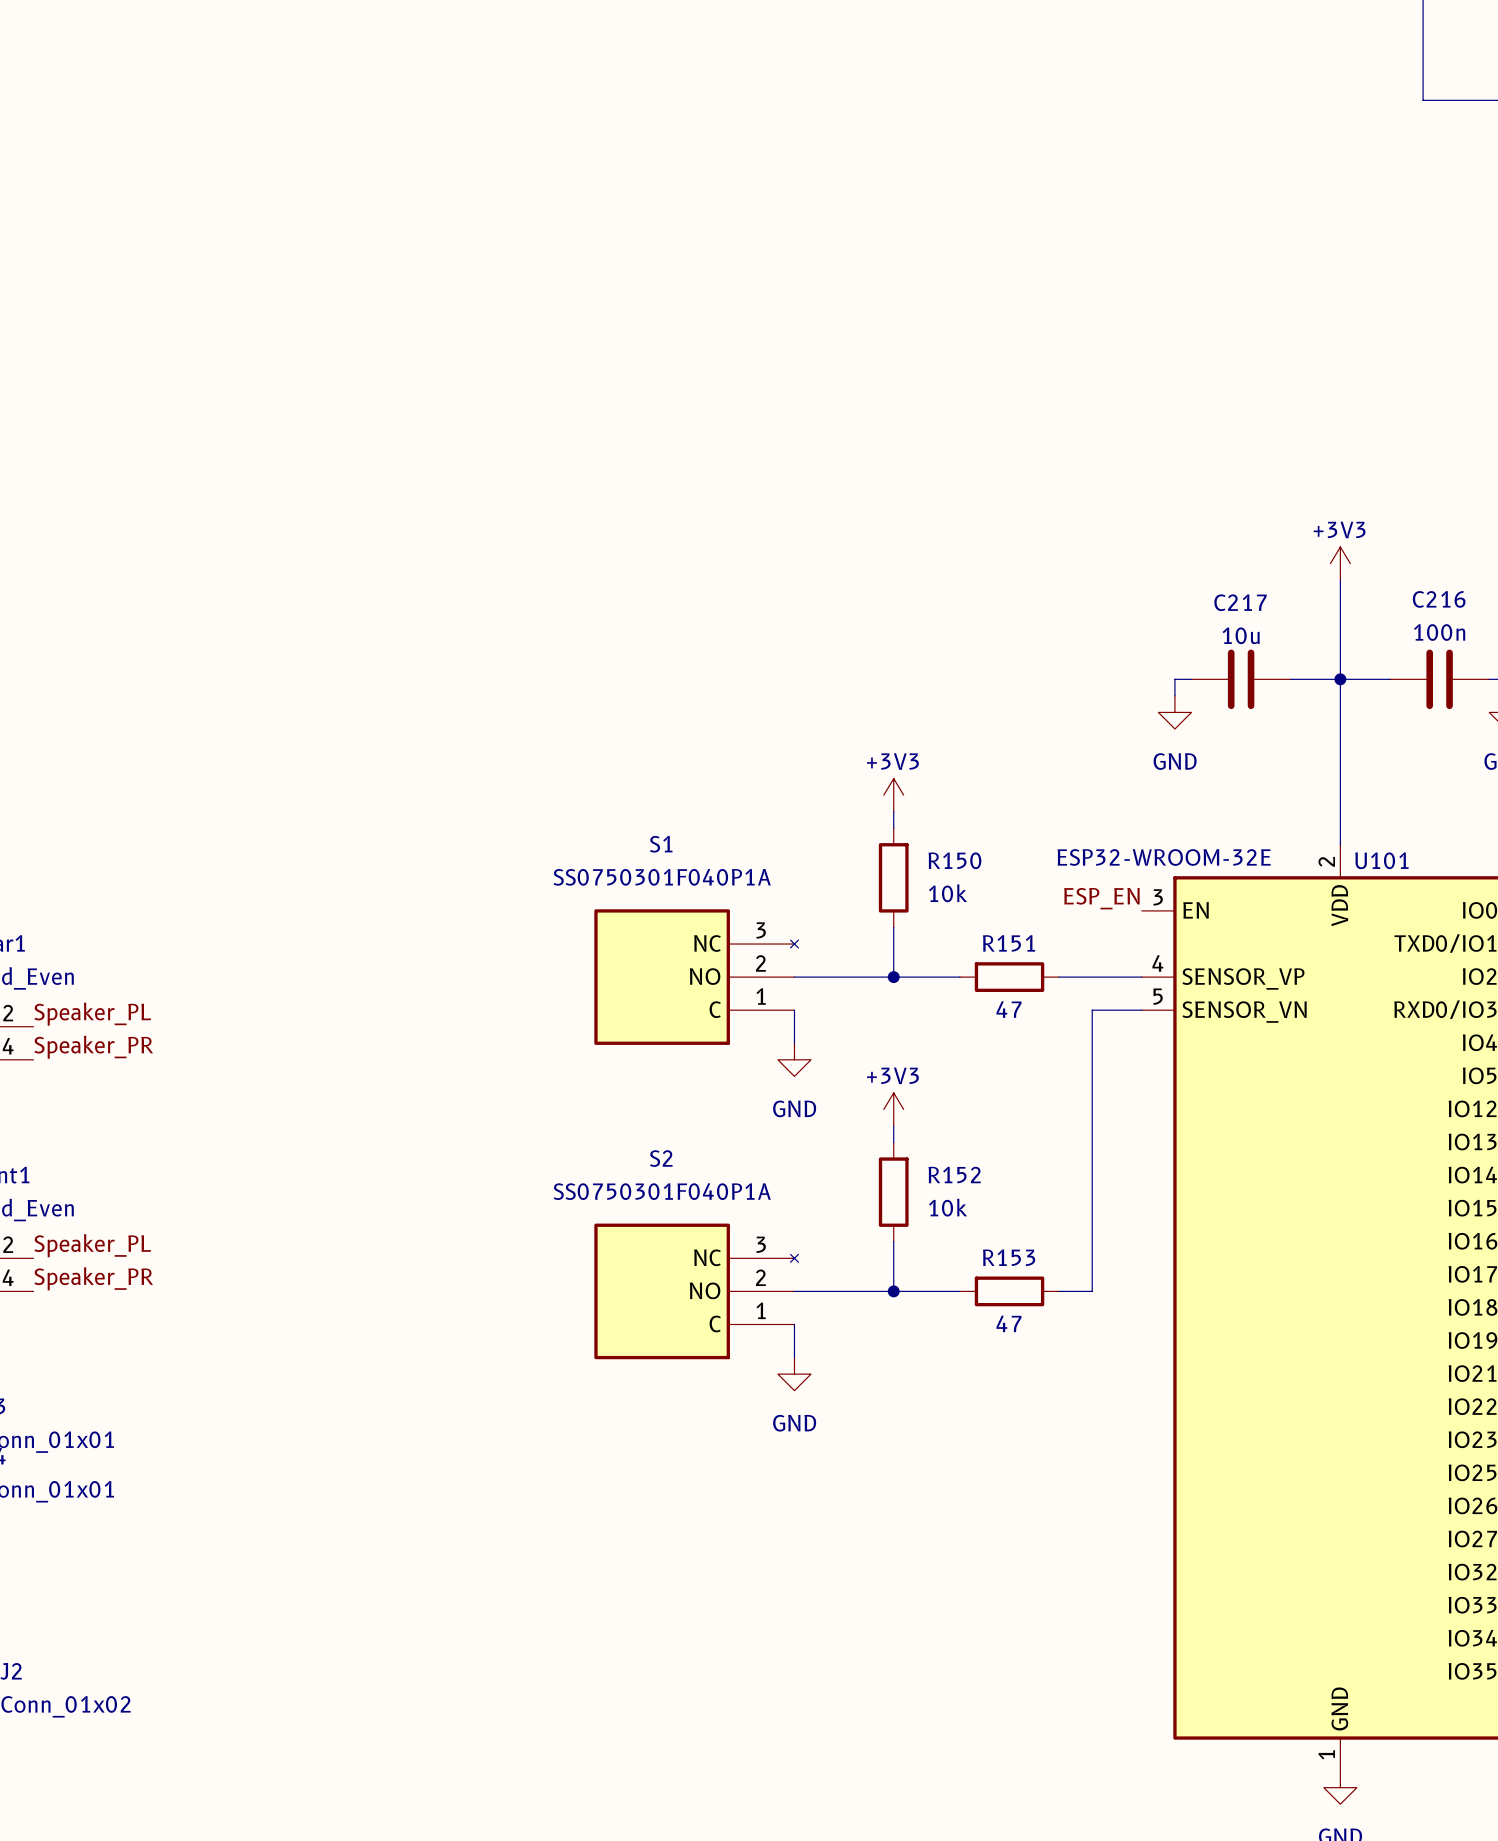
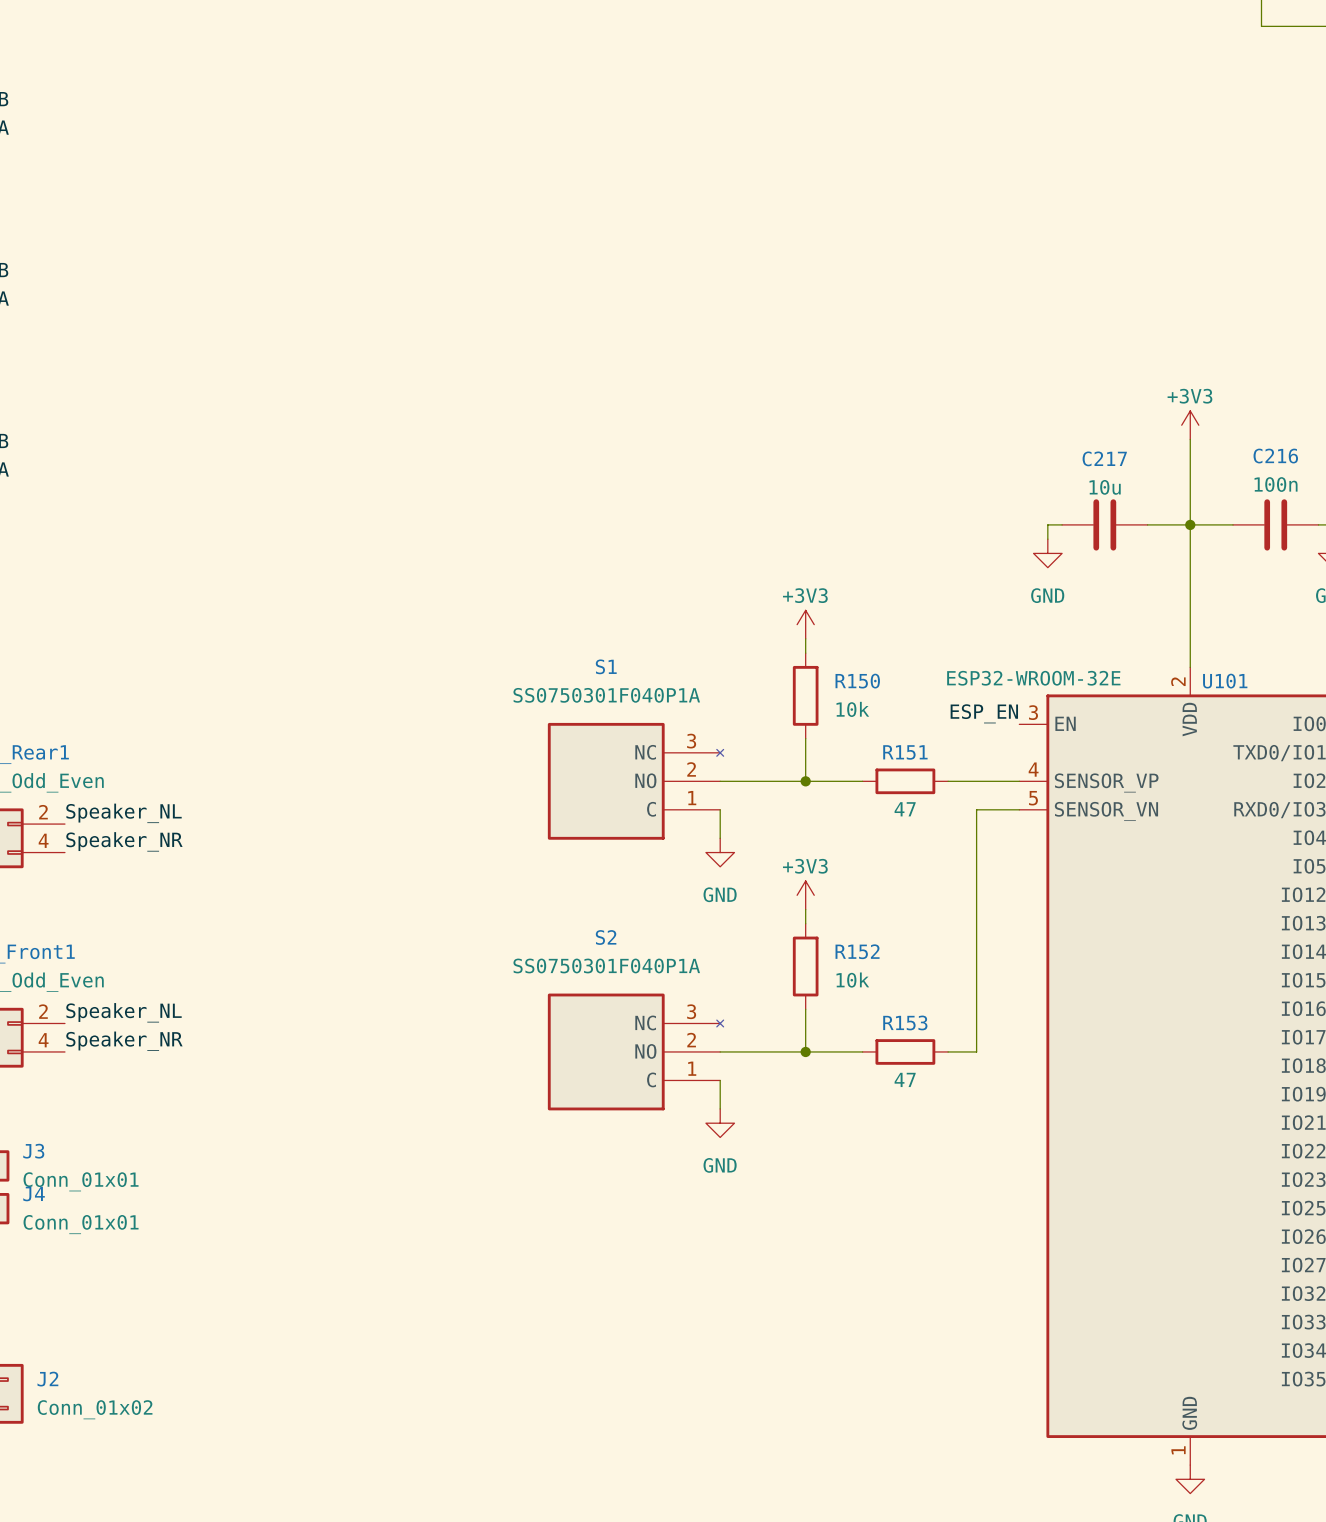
label: Speaker_PL (92, 1014) -> Speaker_NL (123, 813)
label: Speaker_PR (93, 1047) -> Speaker_NR (124, 841)
label: Speaker_PL (92, 1245) -> Speaker_NL (123, 1012)
label: Speaker_PR (93, 1278) -> Speaker_NR (124, 1041)

